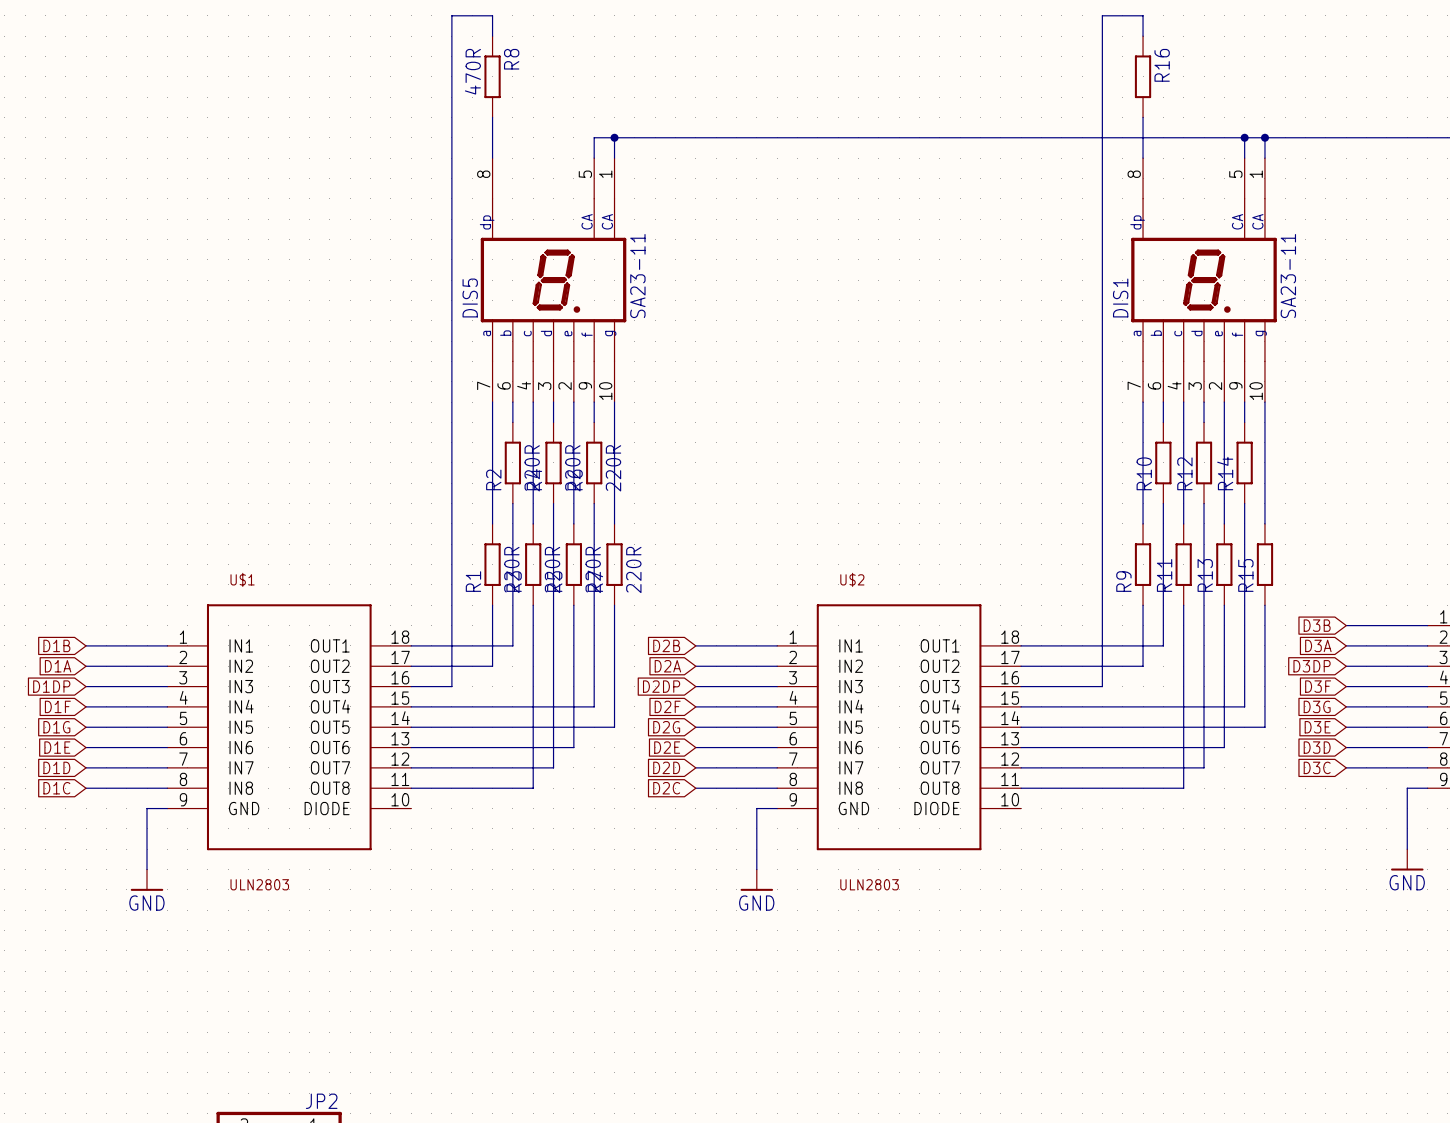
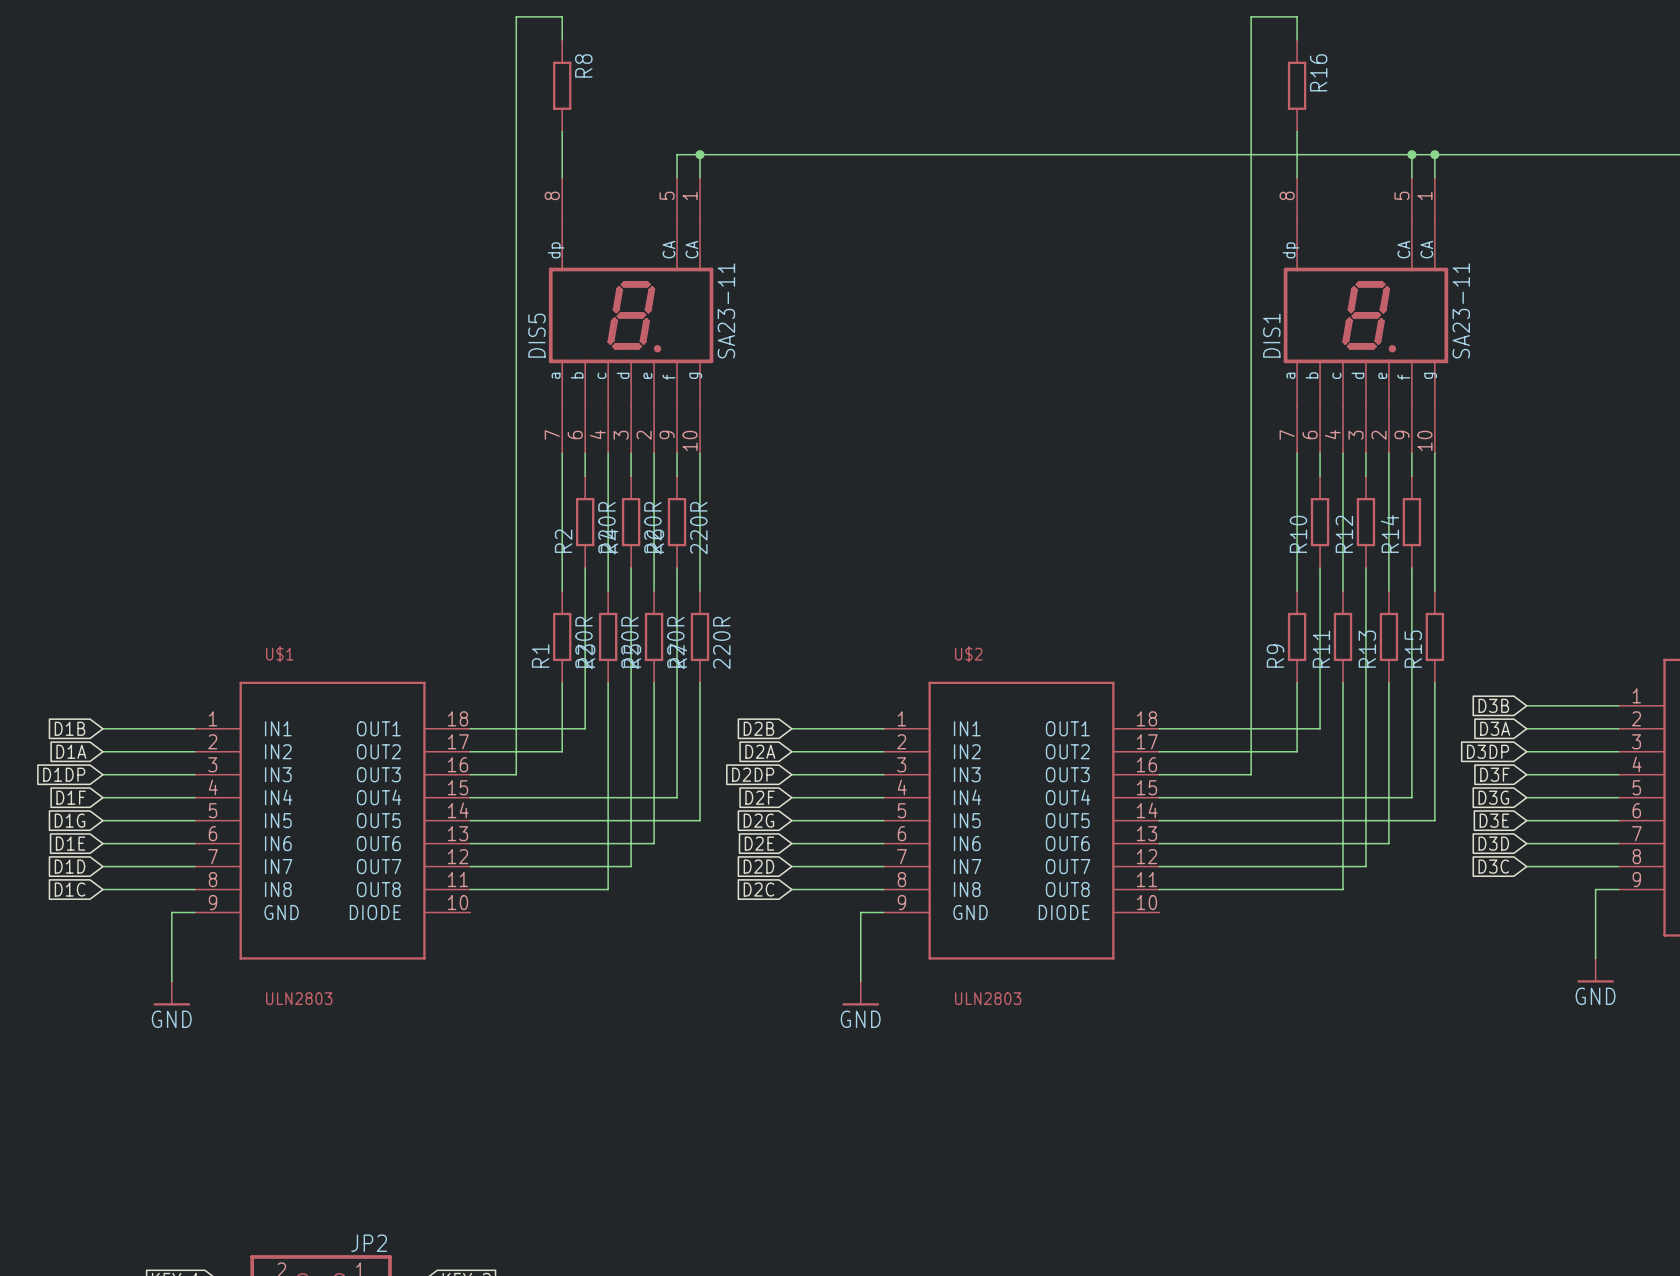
R8 value: 470R (472, 71) -> none

